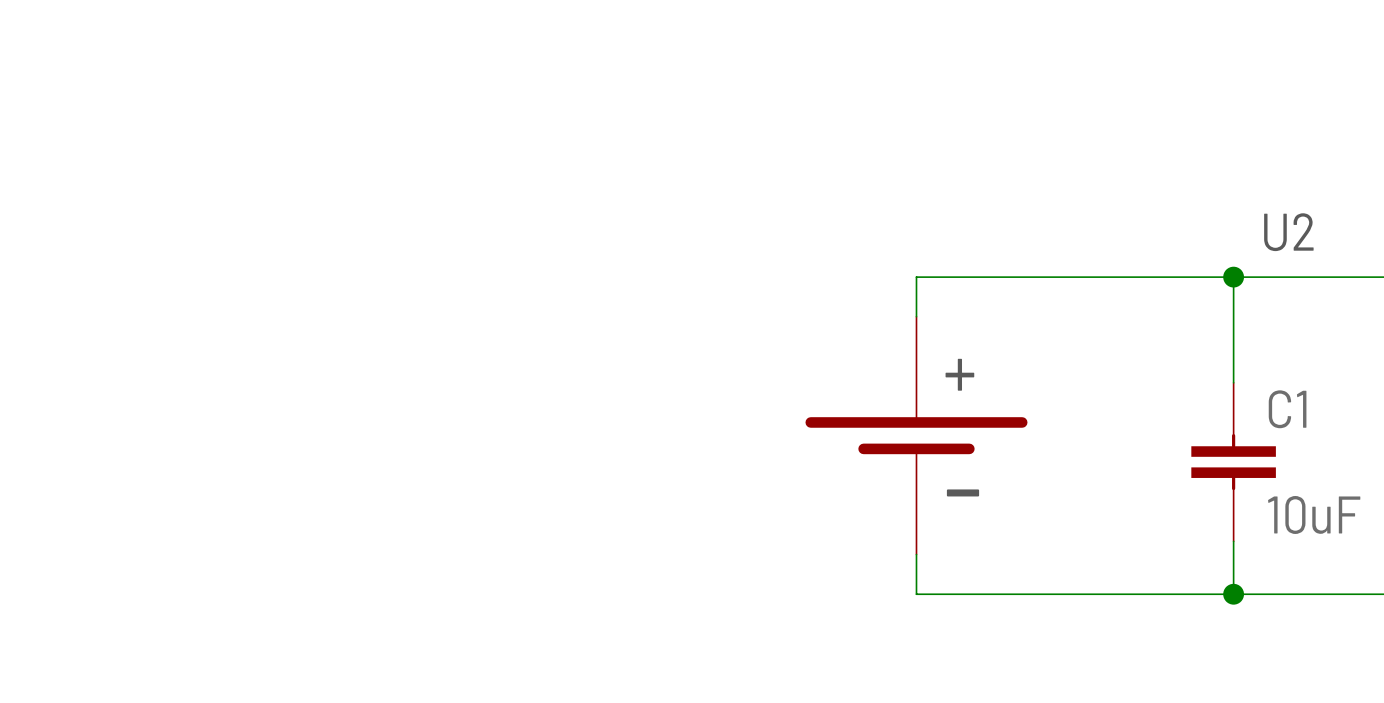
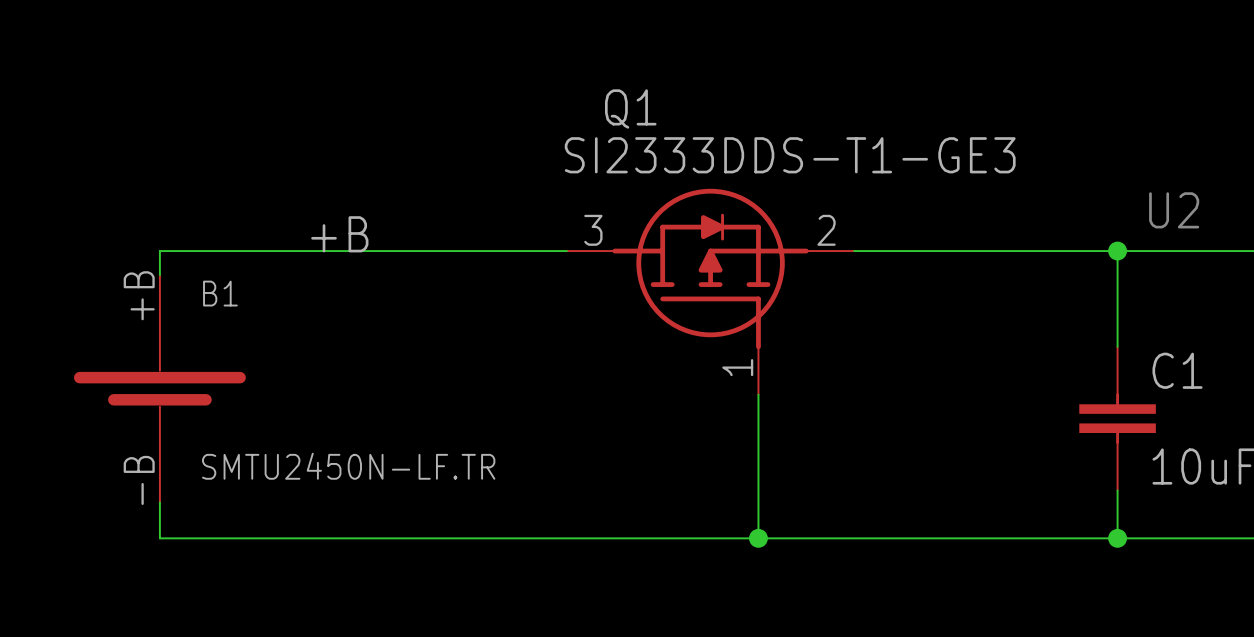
label: none -> +B (339, 234)
wire: none -> (566, 251) (159, 251) (159, 274)
wire: (942, 277) (916, 277) (916, 316) -> none
Q1: none -> SI2333DDS-T1-GE3 (710, 291)
B1: none -> SMTU2450N-LF.TR (159, 388)
wire: none -> (758, 394) (758, 538)
part: (916, 435) -> none
wire: (916, 554) (916, 594) -> (159, 502) (159, 538) (830, 538)
junction: none -> (758, 538)

